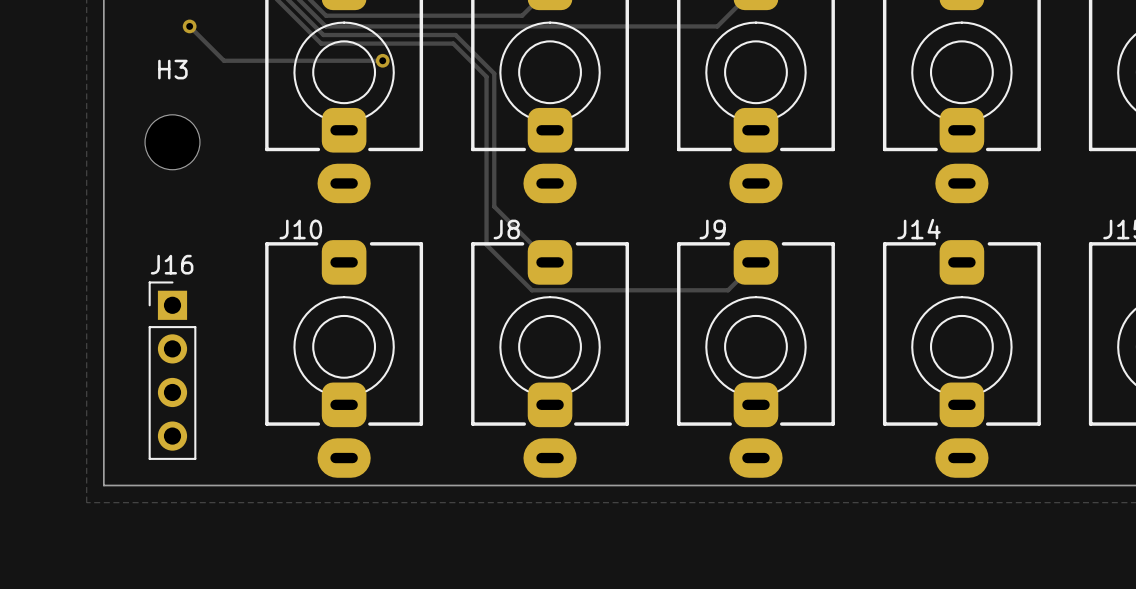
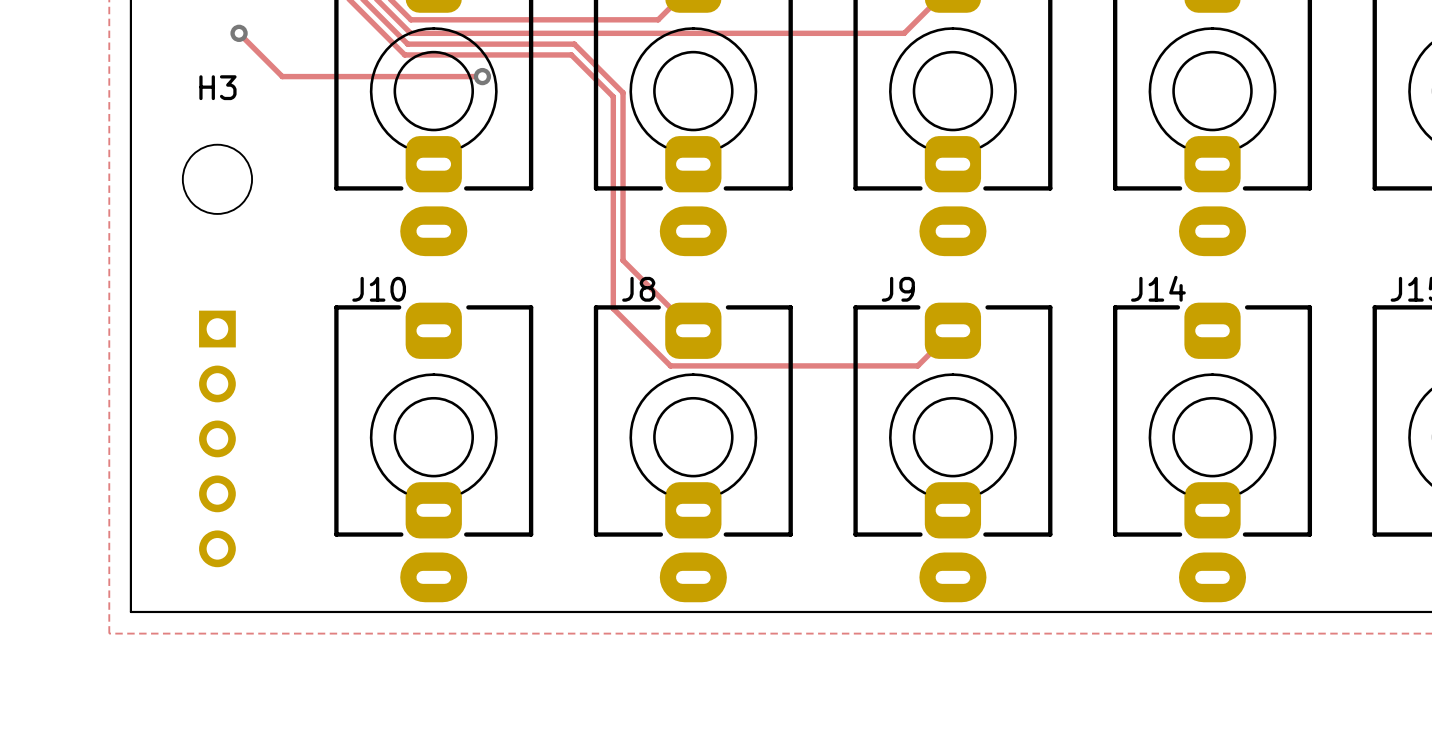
part: none -> (217, 438)
J16: (172, 370) -> none

